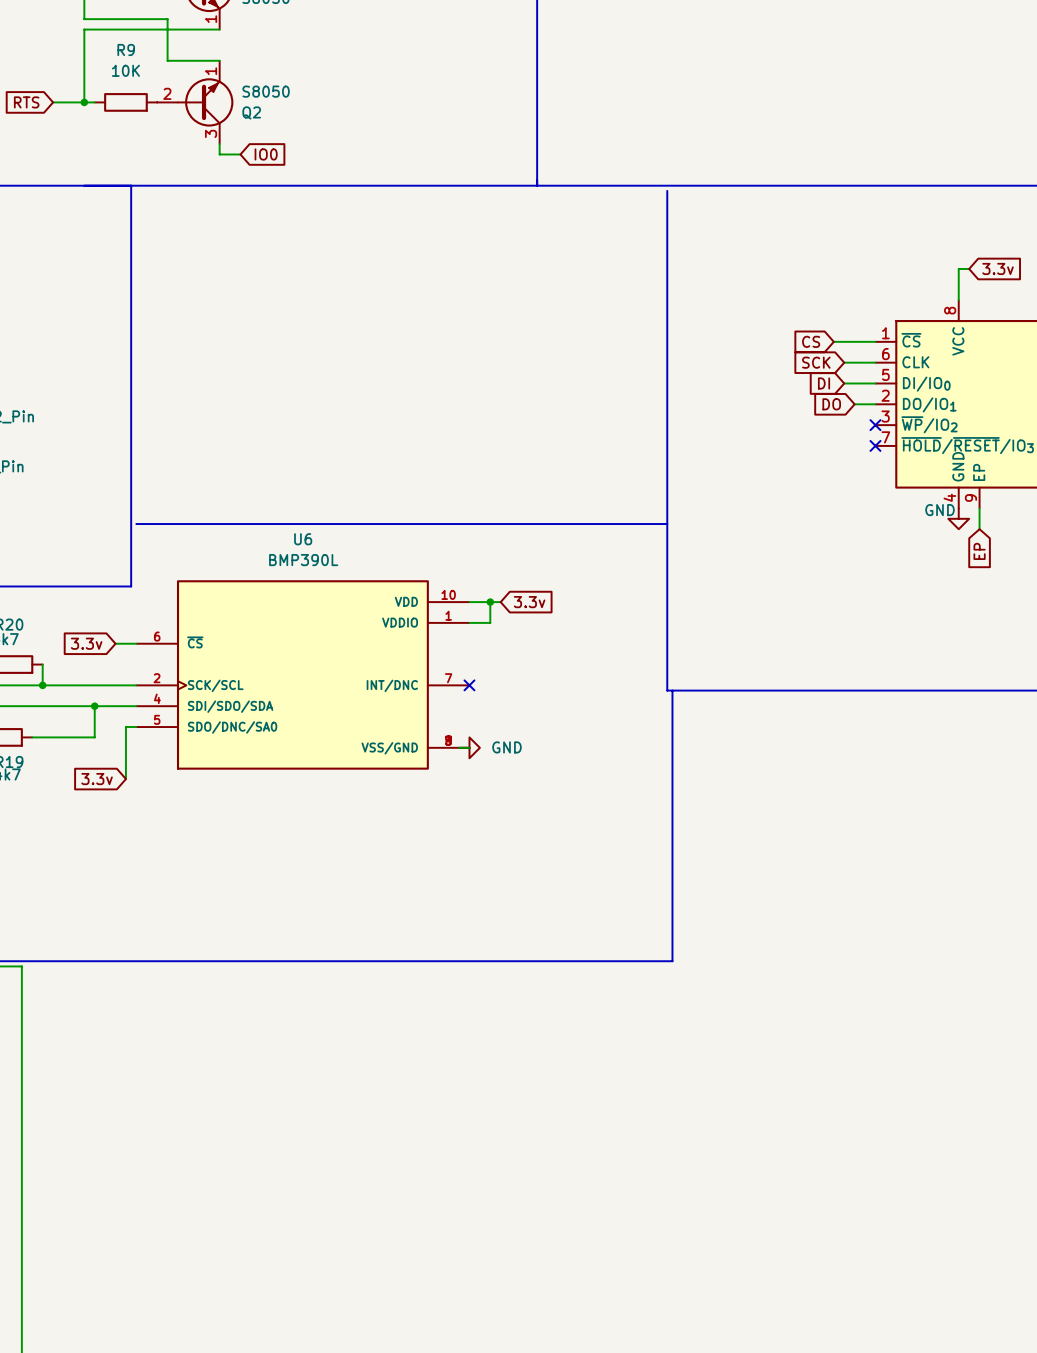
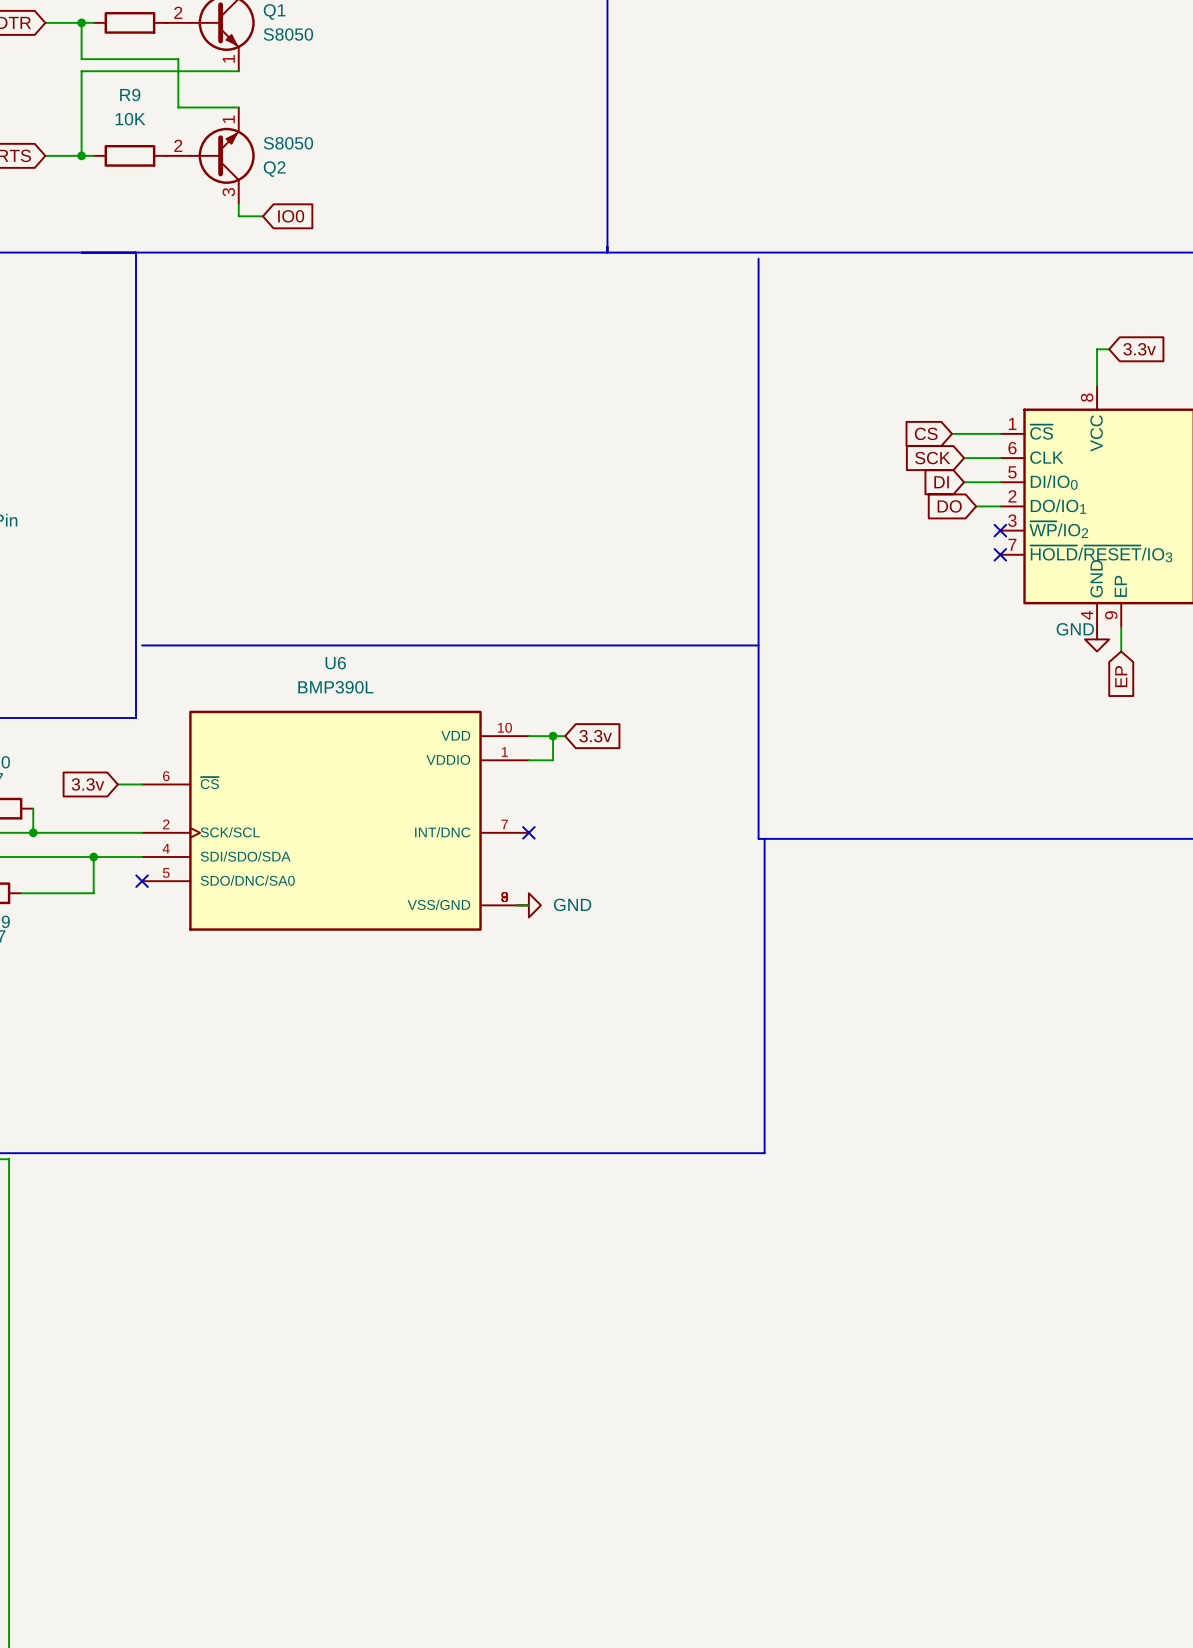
wire: (136, 727) (125, 727) (125, 779) -> none
no-connect mark: none -> (142, 881)
global label: 3.3v (97, 779) -> none

